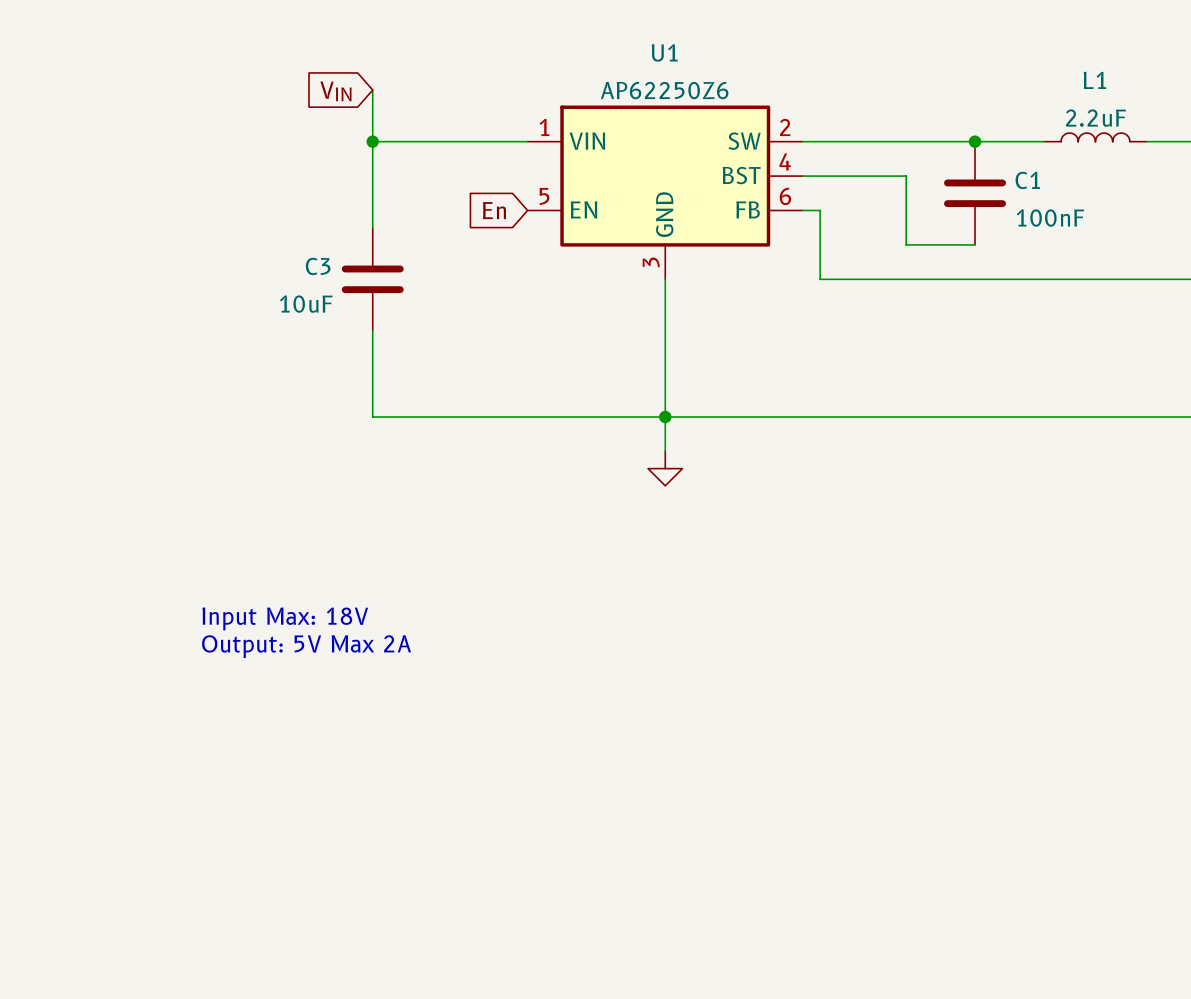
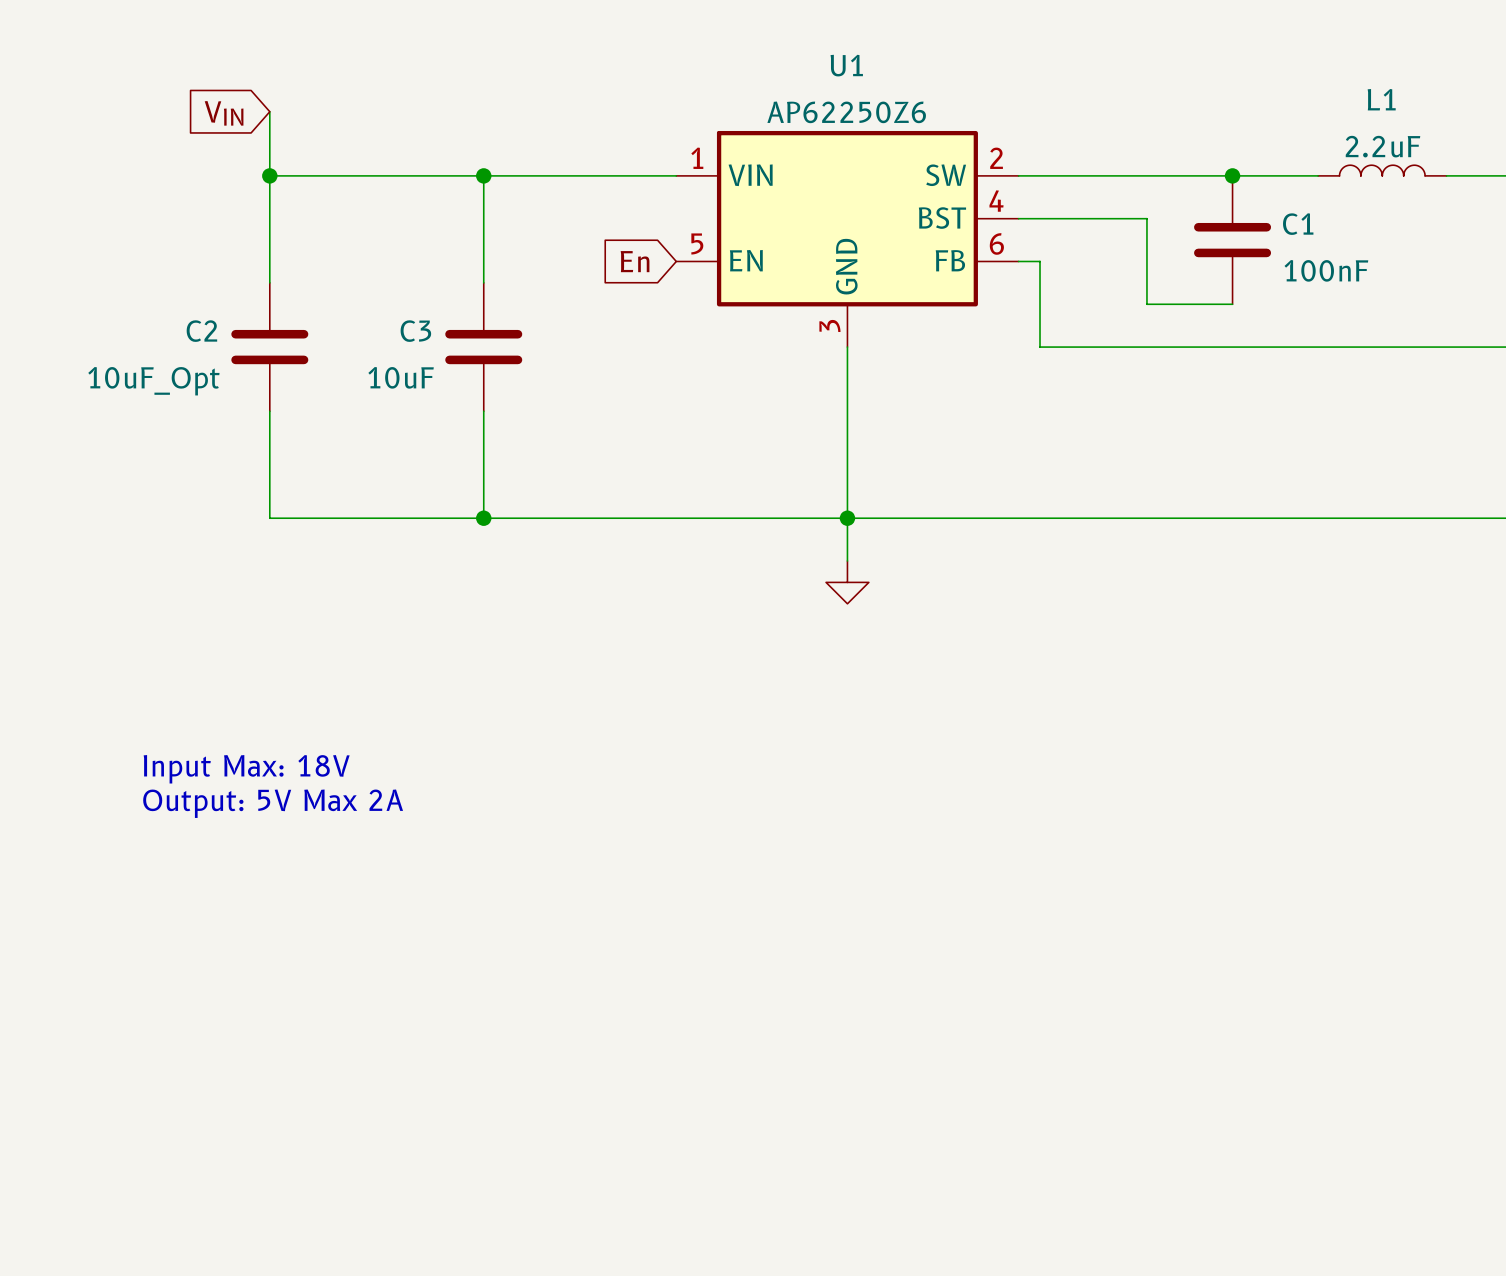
wire: none -> (269, 111) (269, 282)
wire: (372, 90) (372, 141) -> (269, 175) (483, 175)
global label position: VIN (335, 91) -> VIN (224, 113)
junction: none -> (269, 175)
C2: none -> 10uF_Opt (269, 347)
wire: none -> (269, 411) (269, 518) (483, 518)
junction: none -> (483, 518)
text position: Input Max: 18V (285, 618) -> Input Max: 18V (246, 769)
text position: Output: 5V Max 2A (306, 646) -> Output: 5V Max 2A (273, 803)

